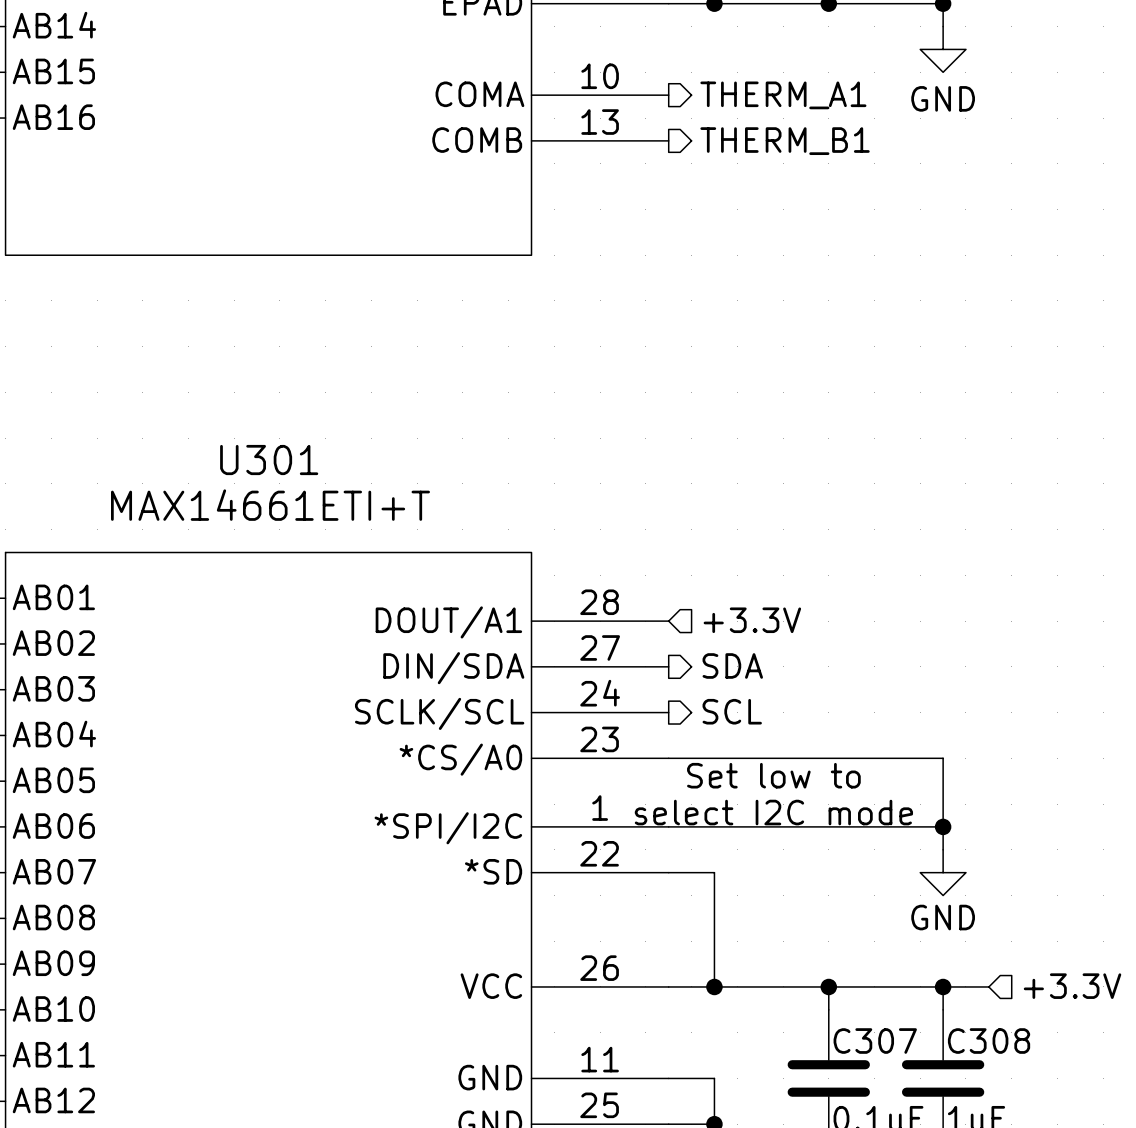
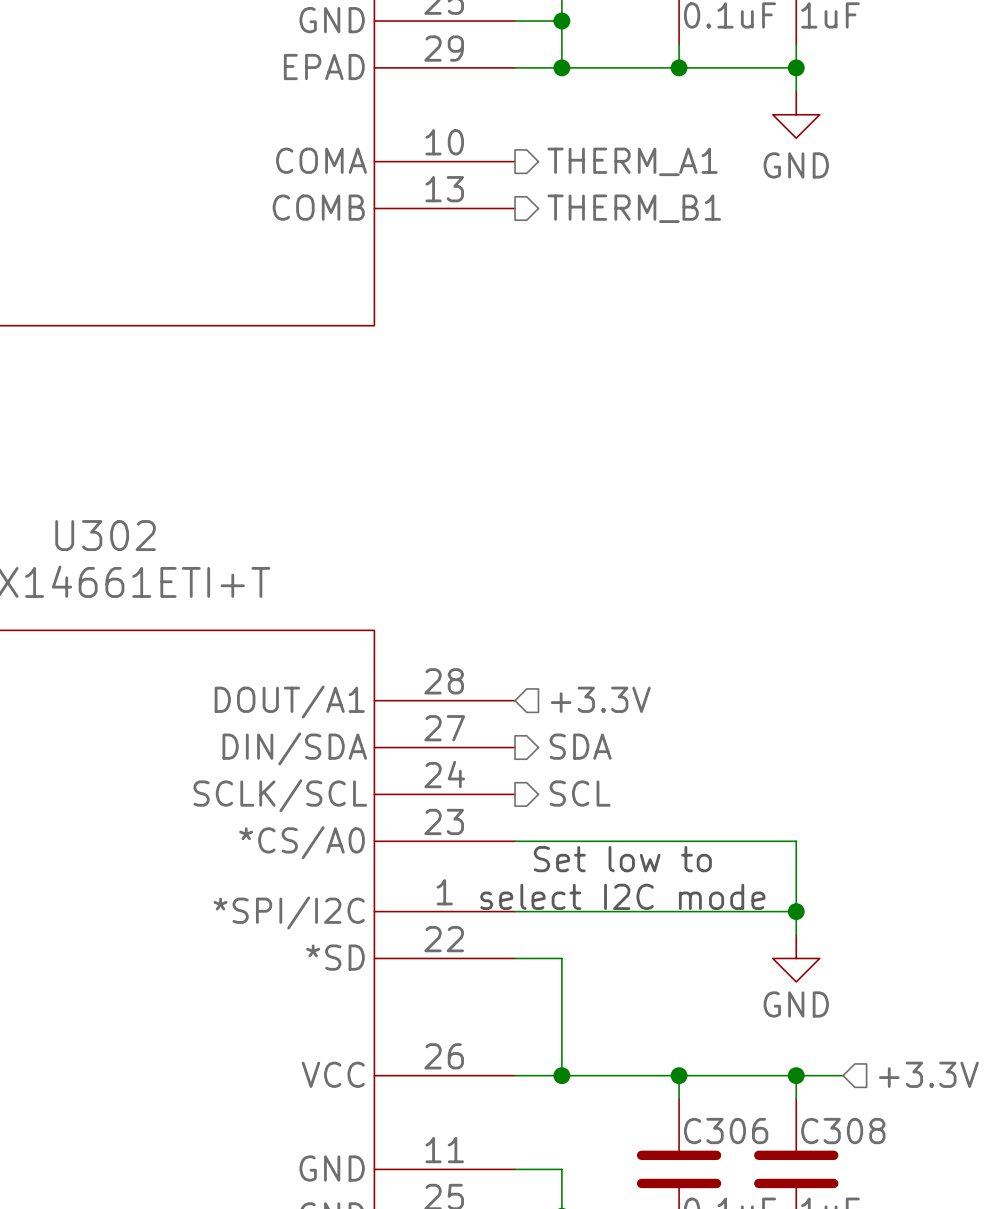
U301 name: U301 (269, 460) -> U302 (105, 535)
C307 name: C307 (875, 1041) -> C306 (726, 1131)

